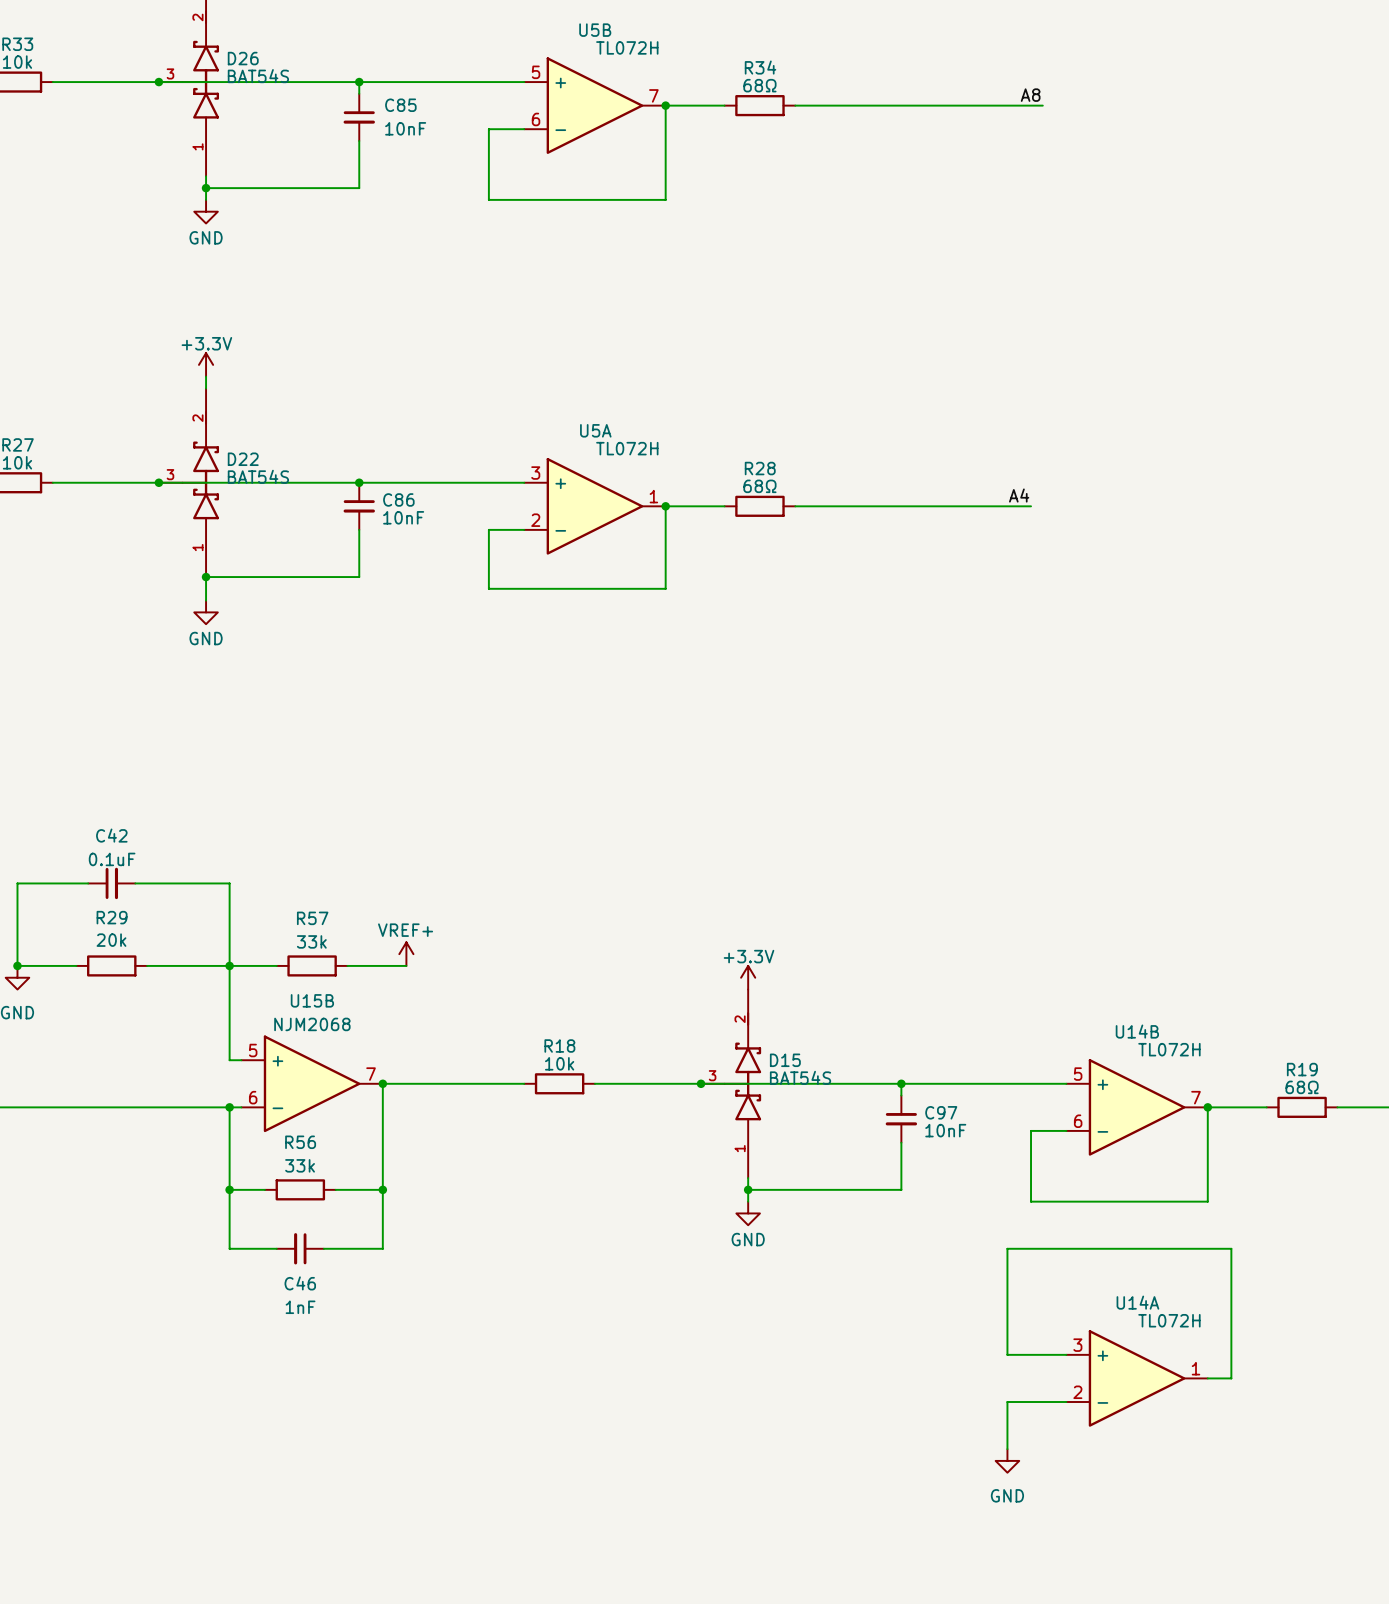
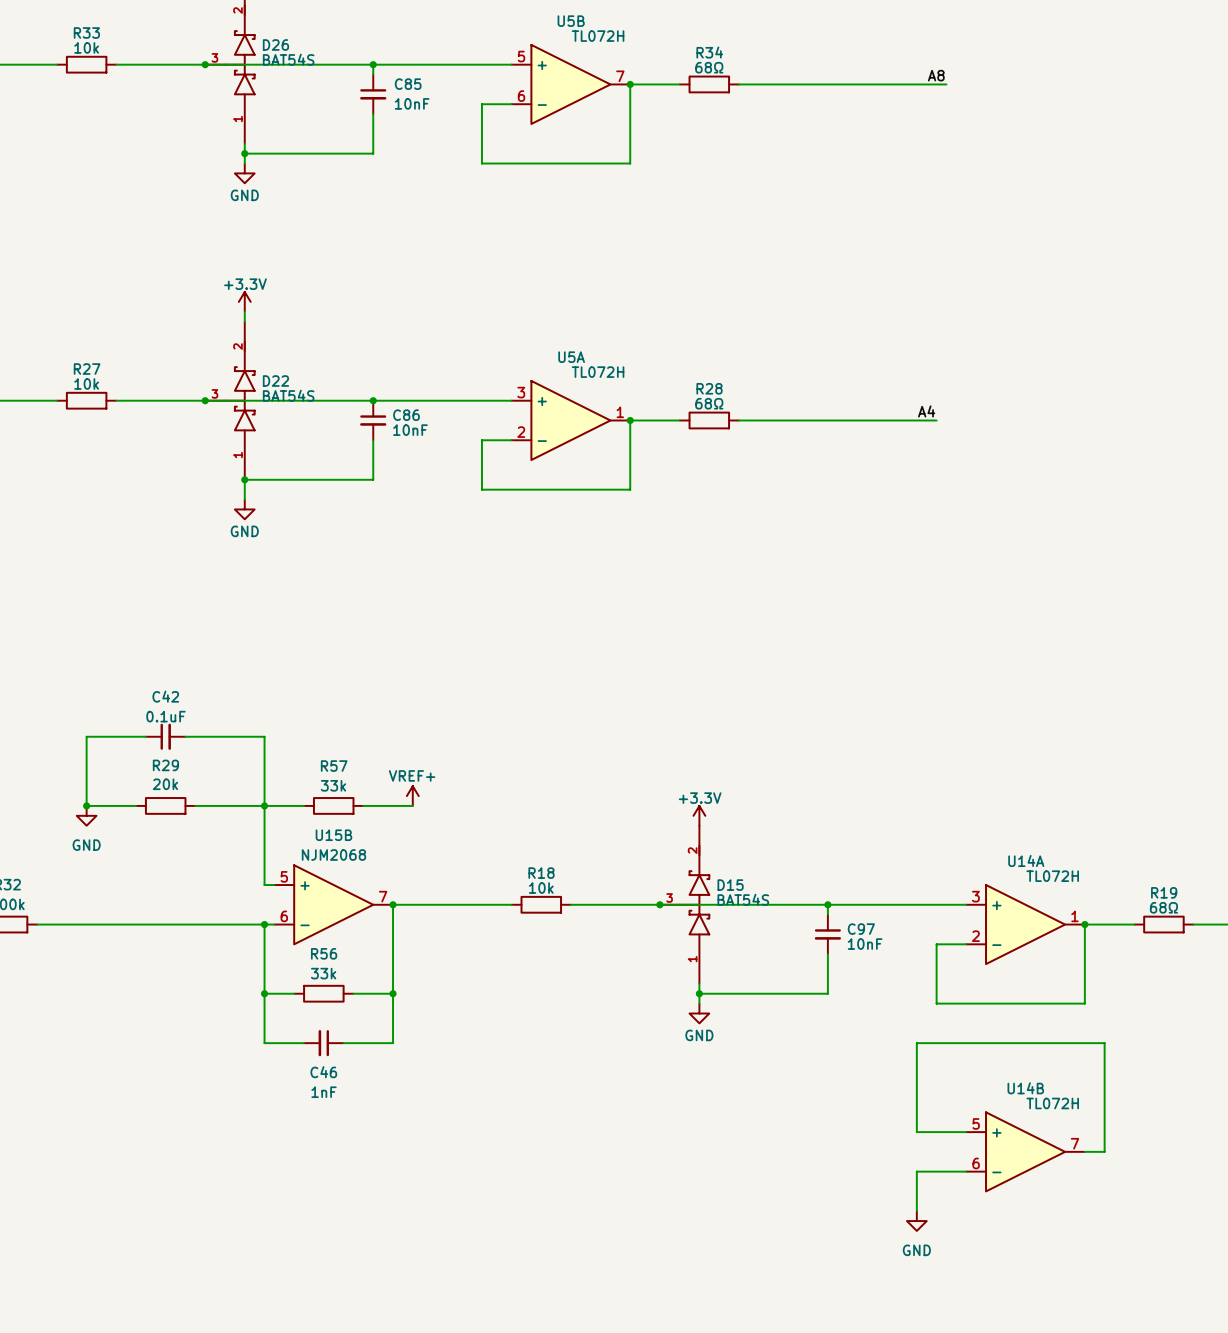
U14B position: (1137, 1107) -> (1025, 1151)
U14A position: (1137, 1378) -> (1025, 924)

